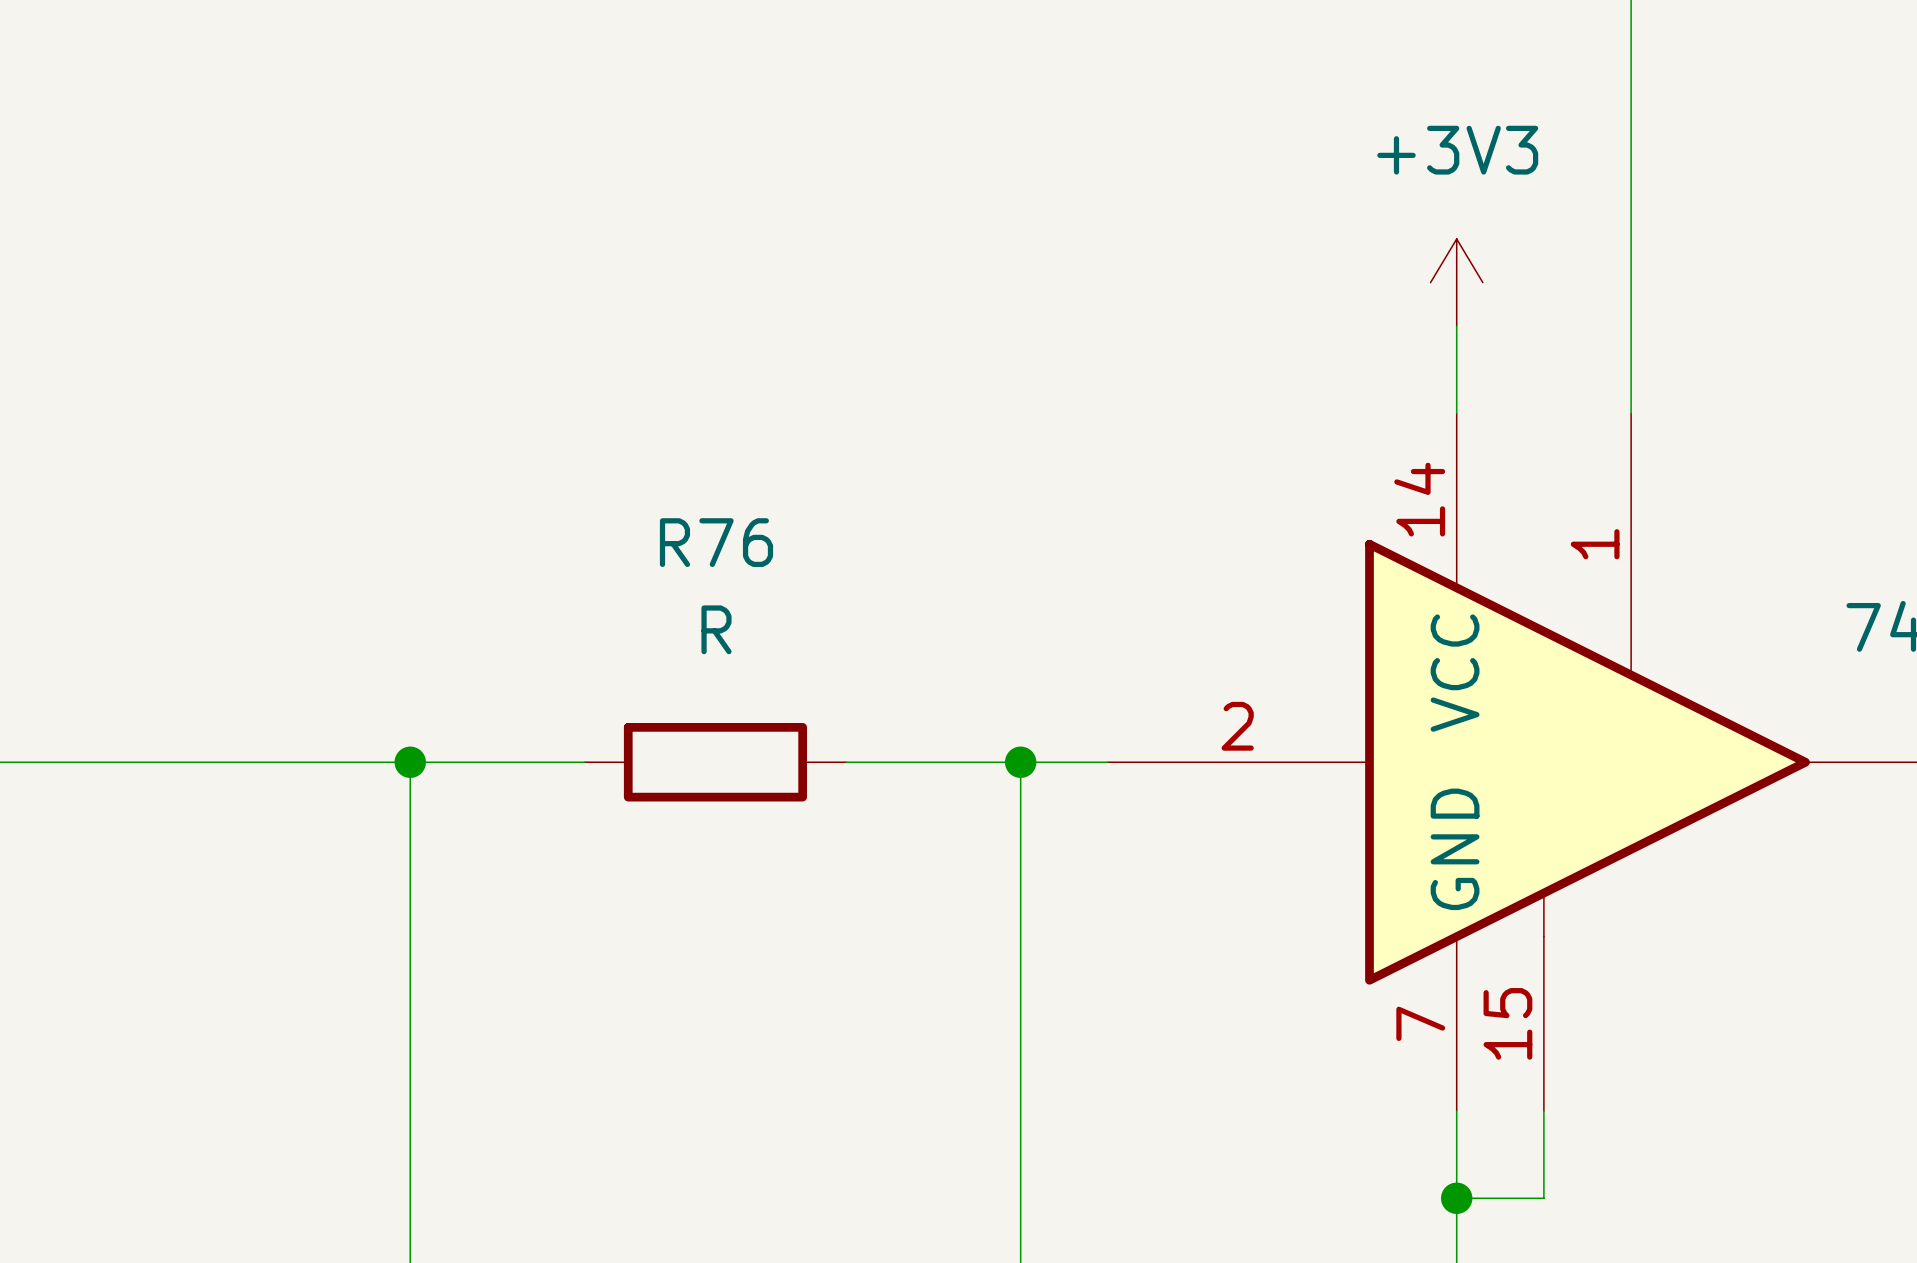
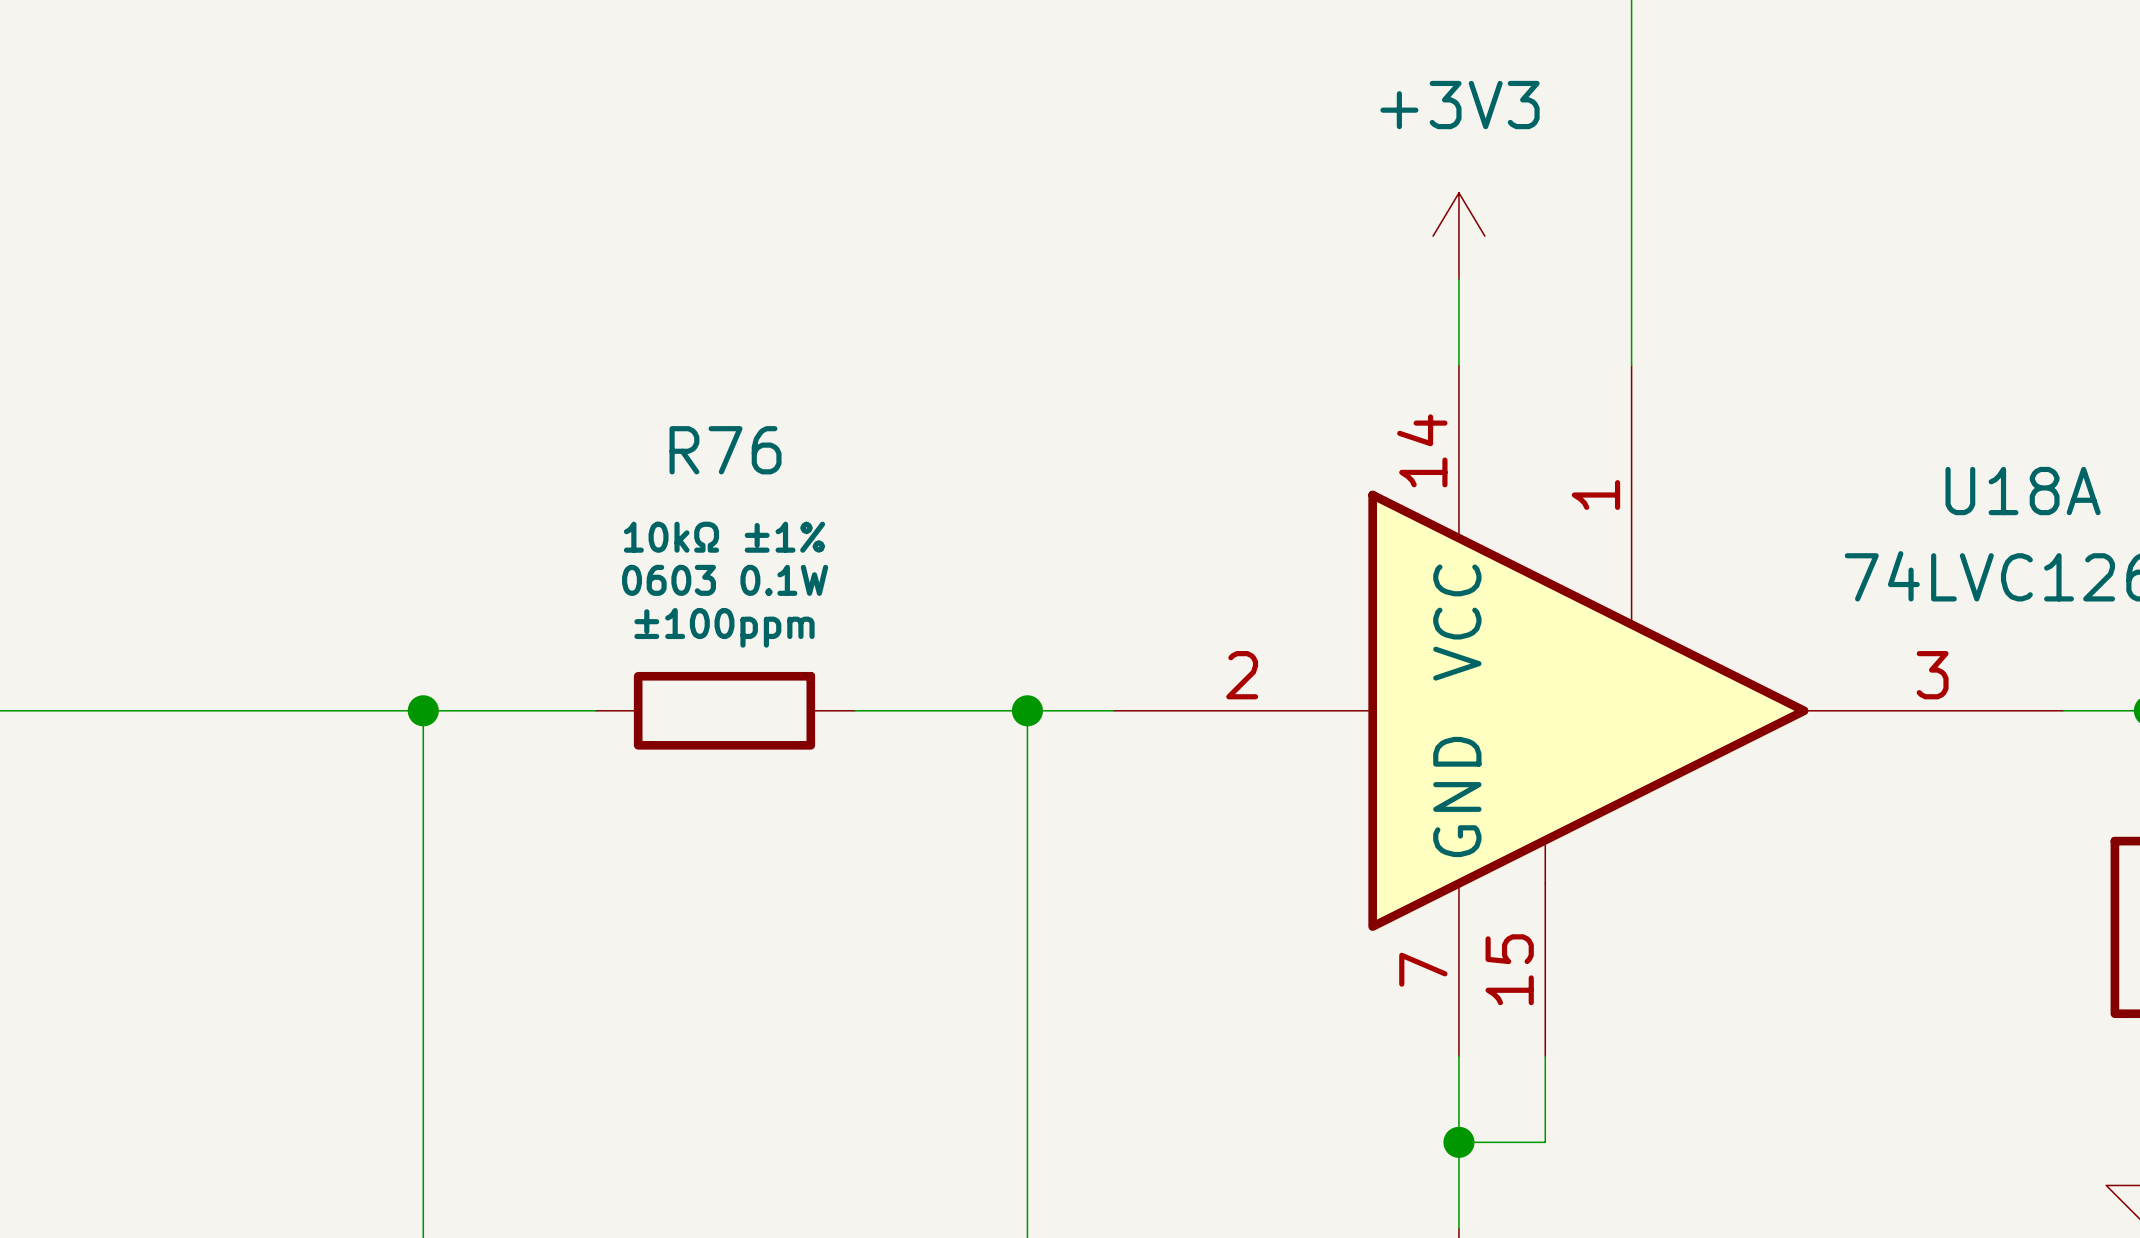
R76 name position: R76 (716, 542) -> R76 (725, 450)
R76 text: none -> 10kΩ ±1% (724, 537)
R76 value: R (716, 629) -> none
R76 text: none -> 0603 0.1W (725, 580)
R76 text: none -> ±100ppm (724, 627)

